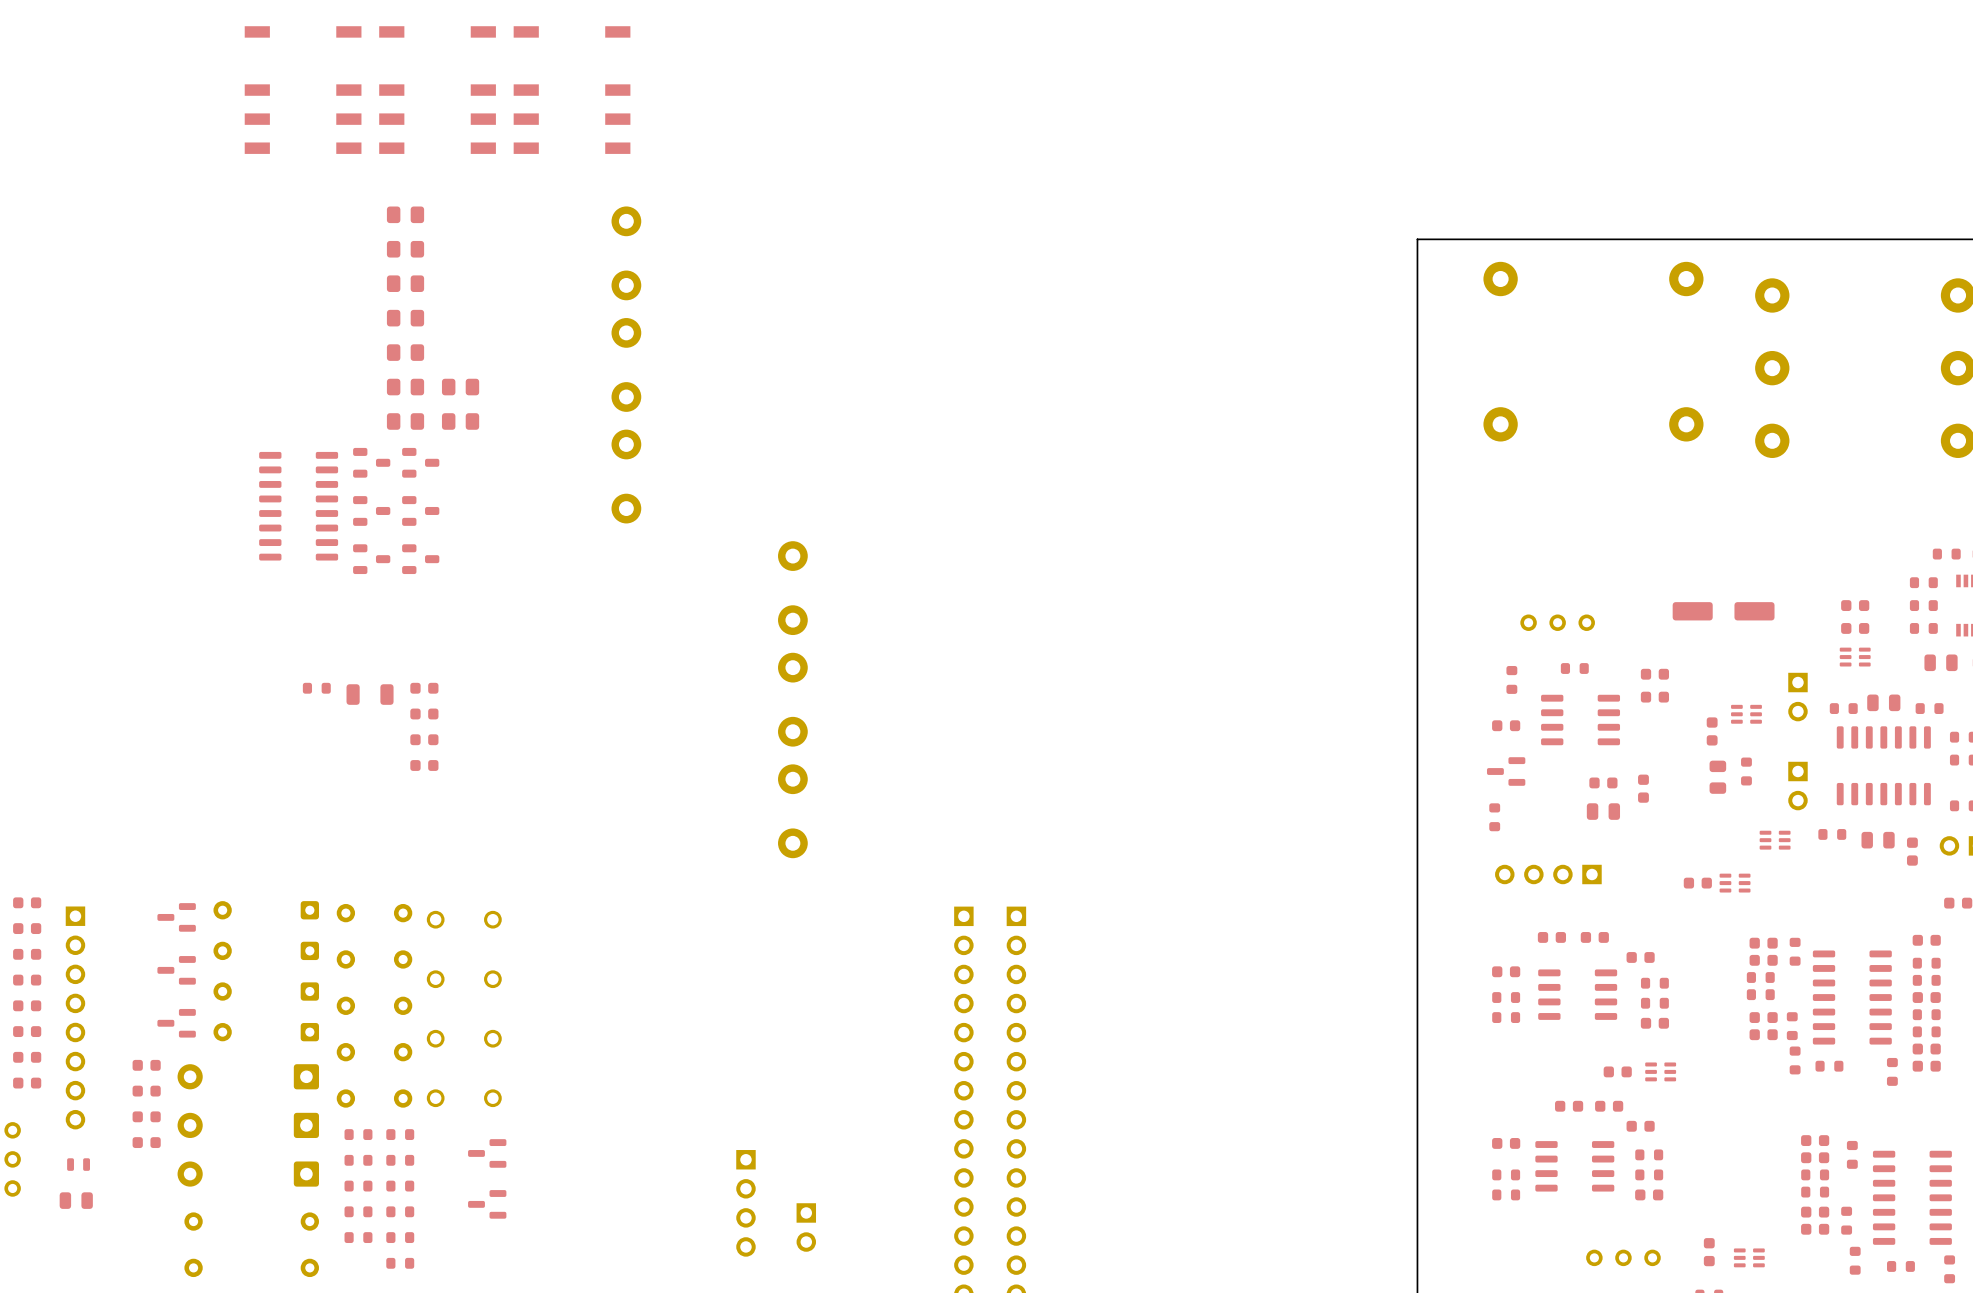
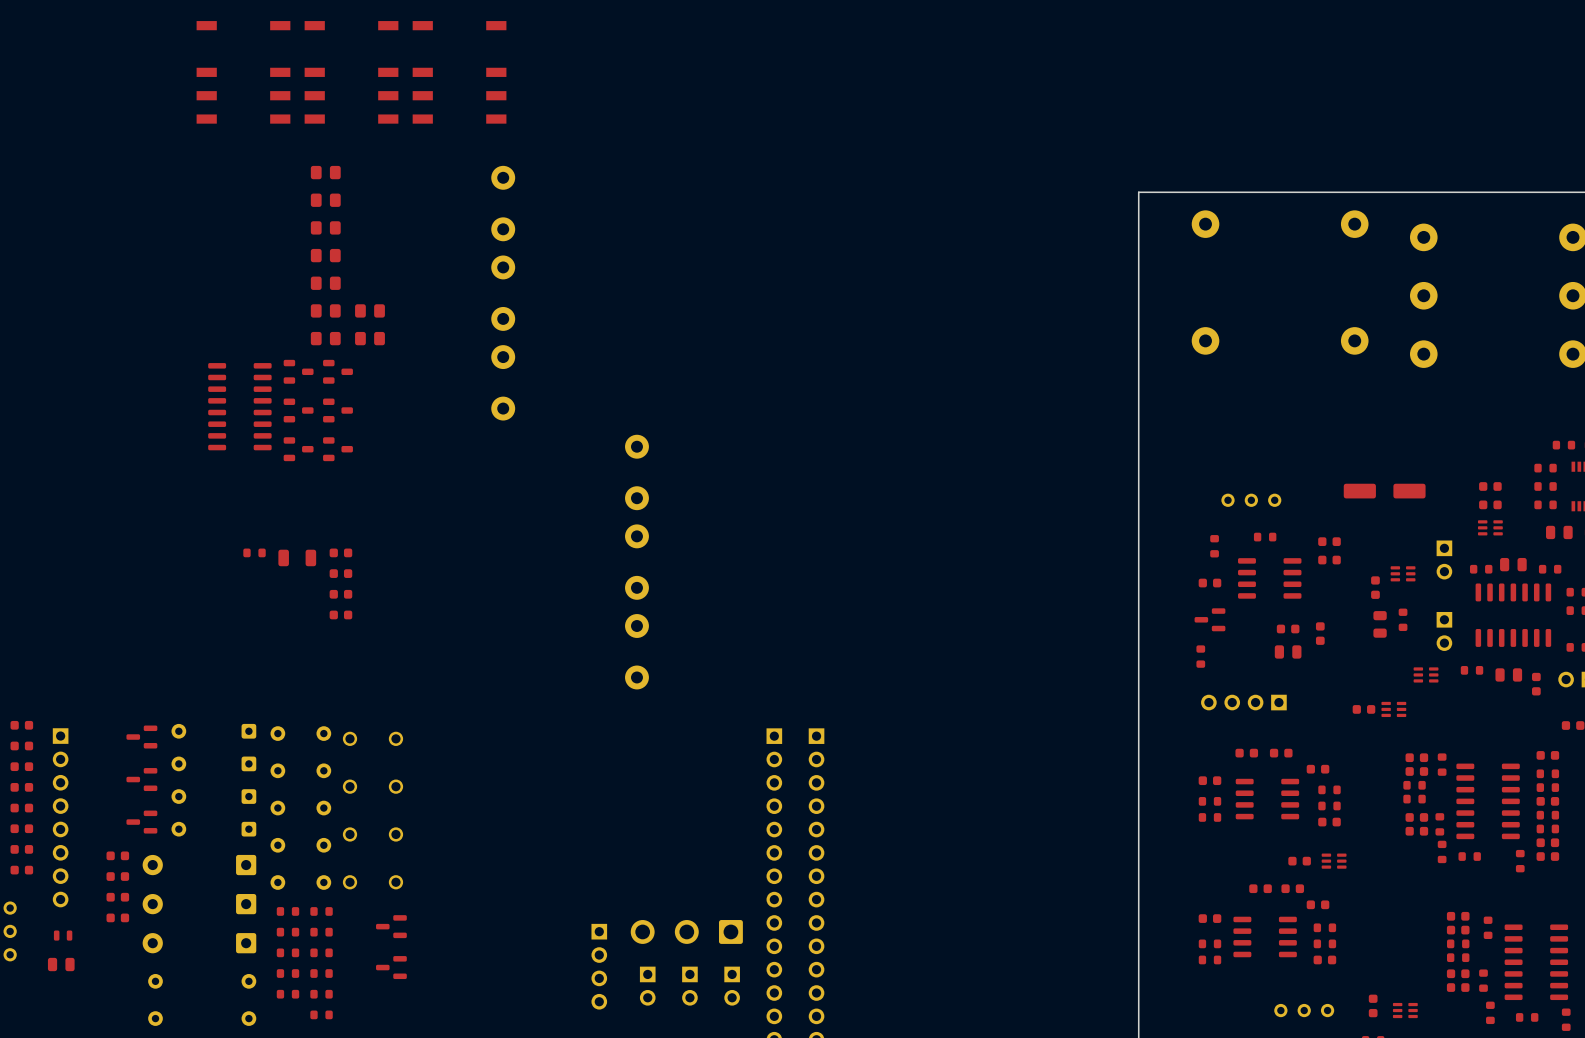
part: none -> (686, 931)
part: none -> (689, 986)
part: none -> (732, 986)

